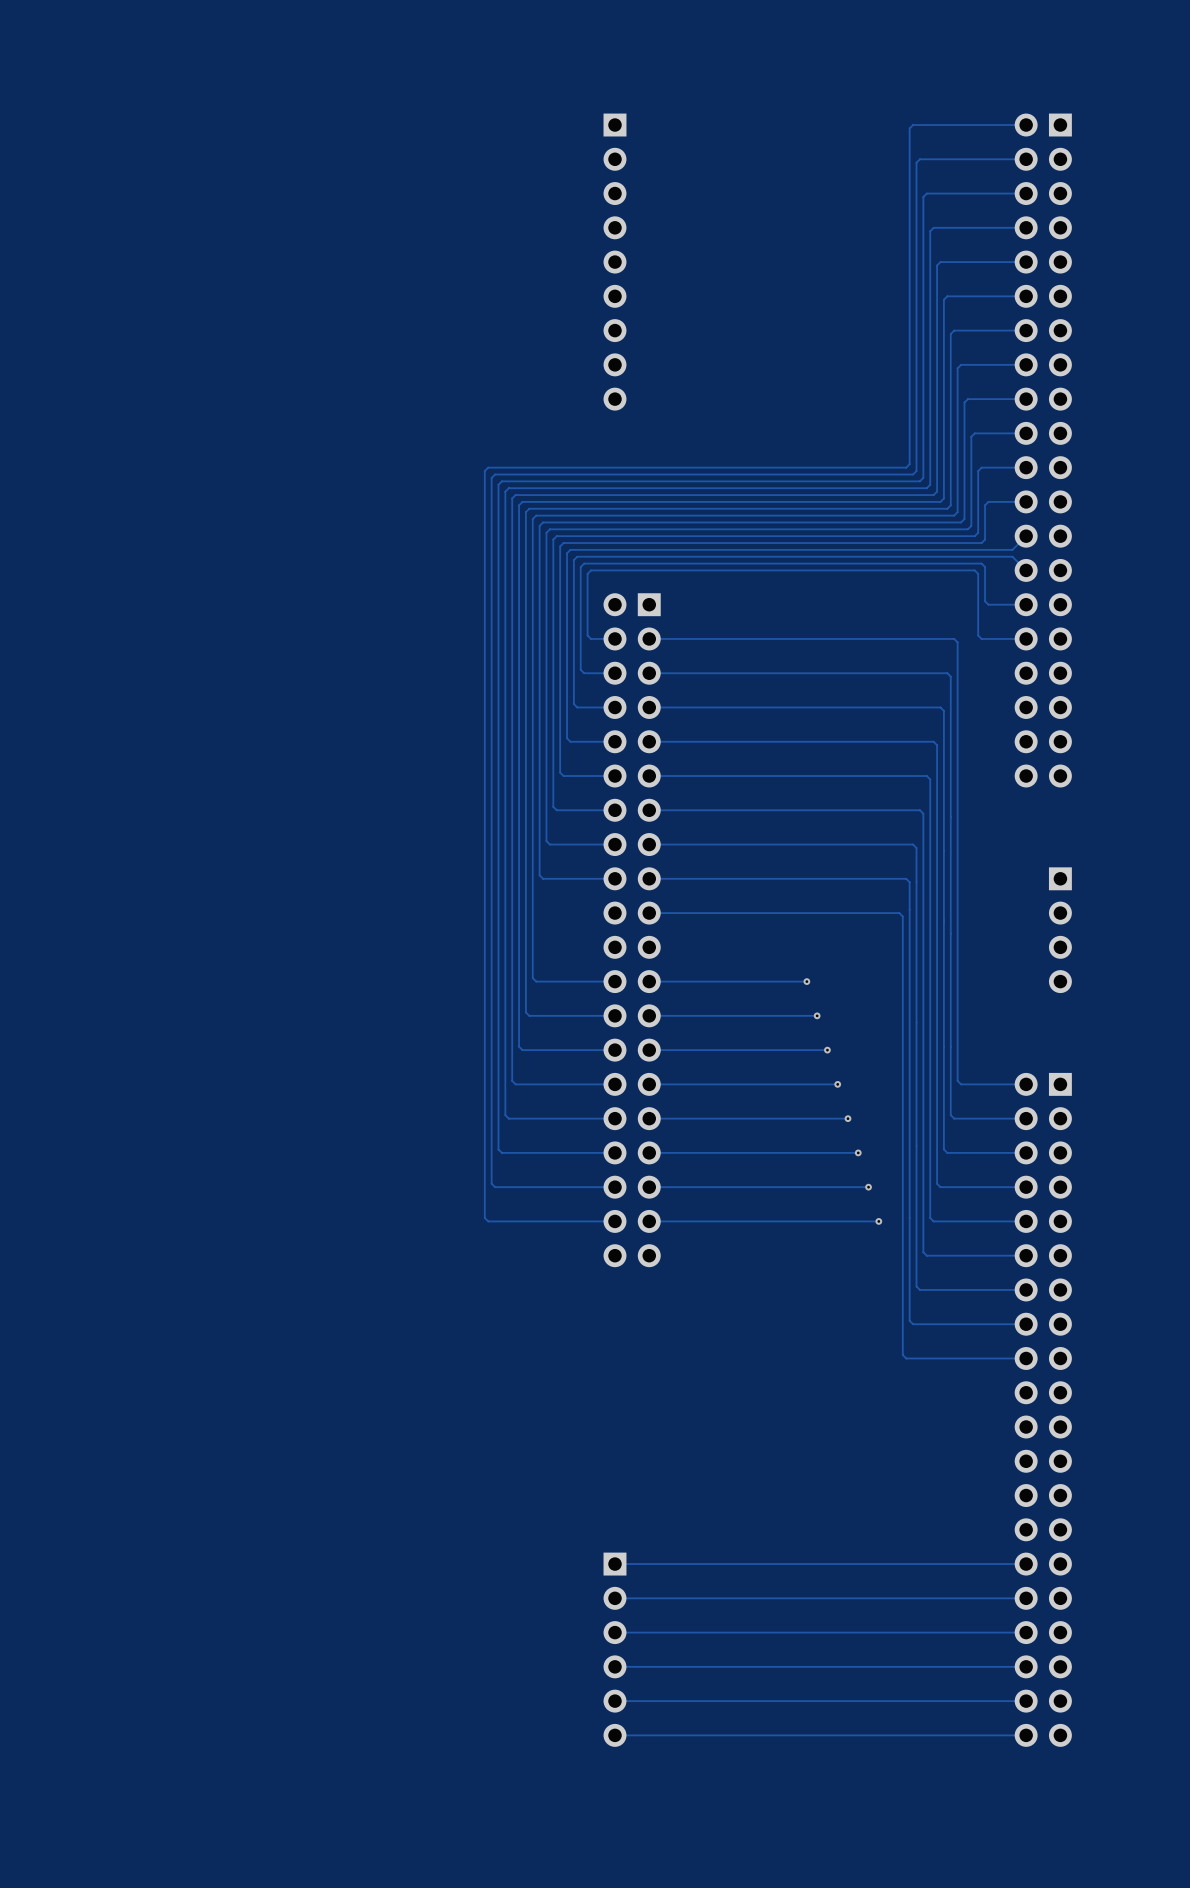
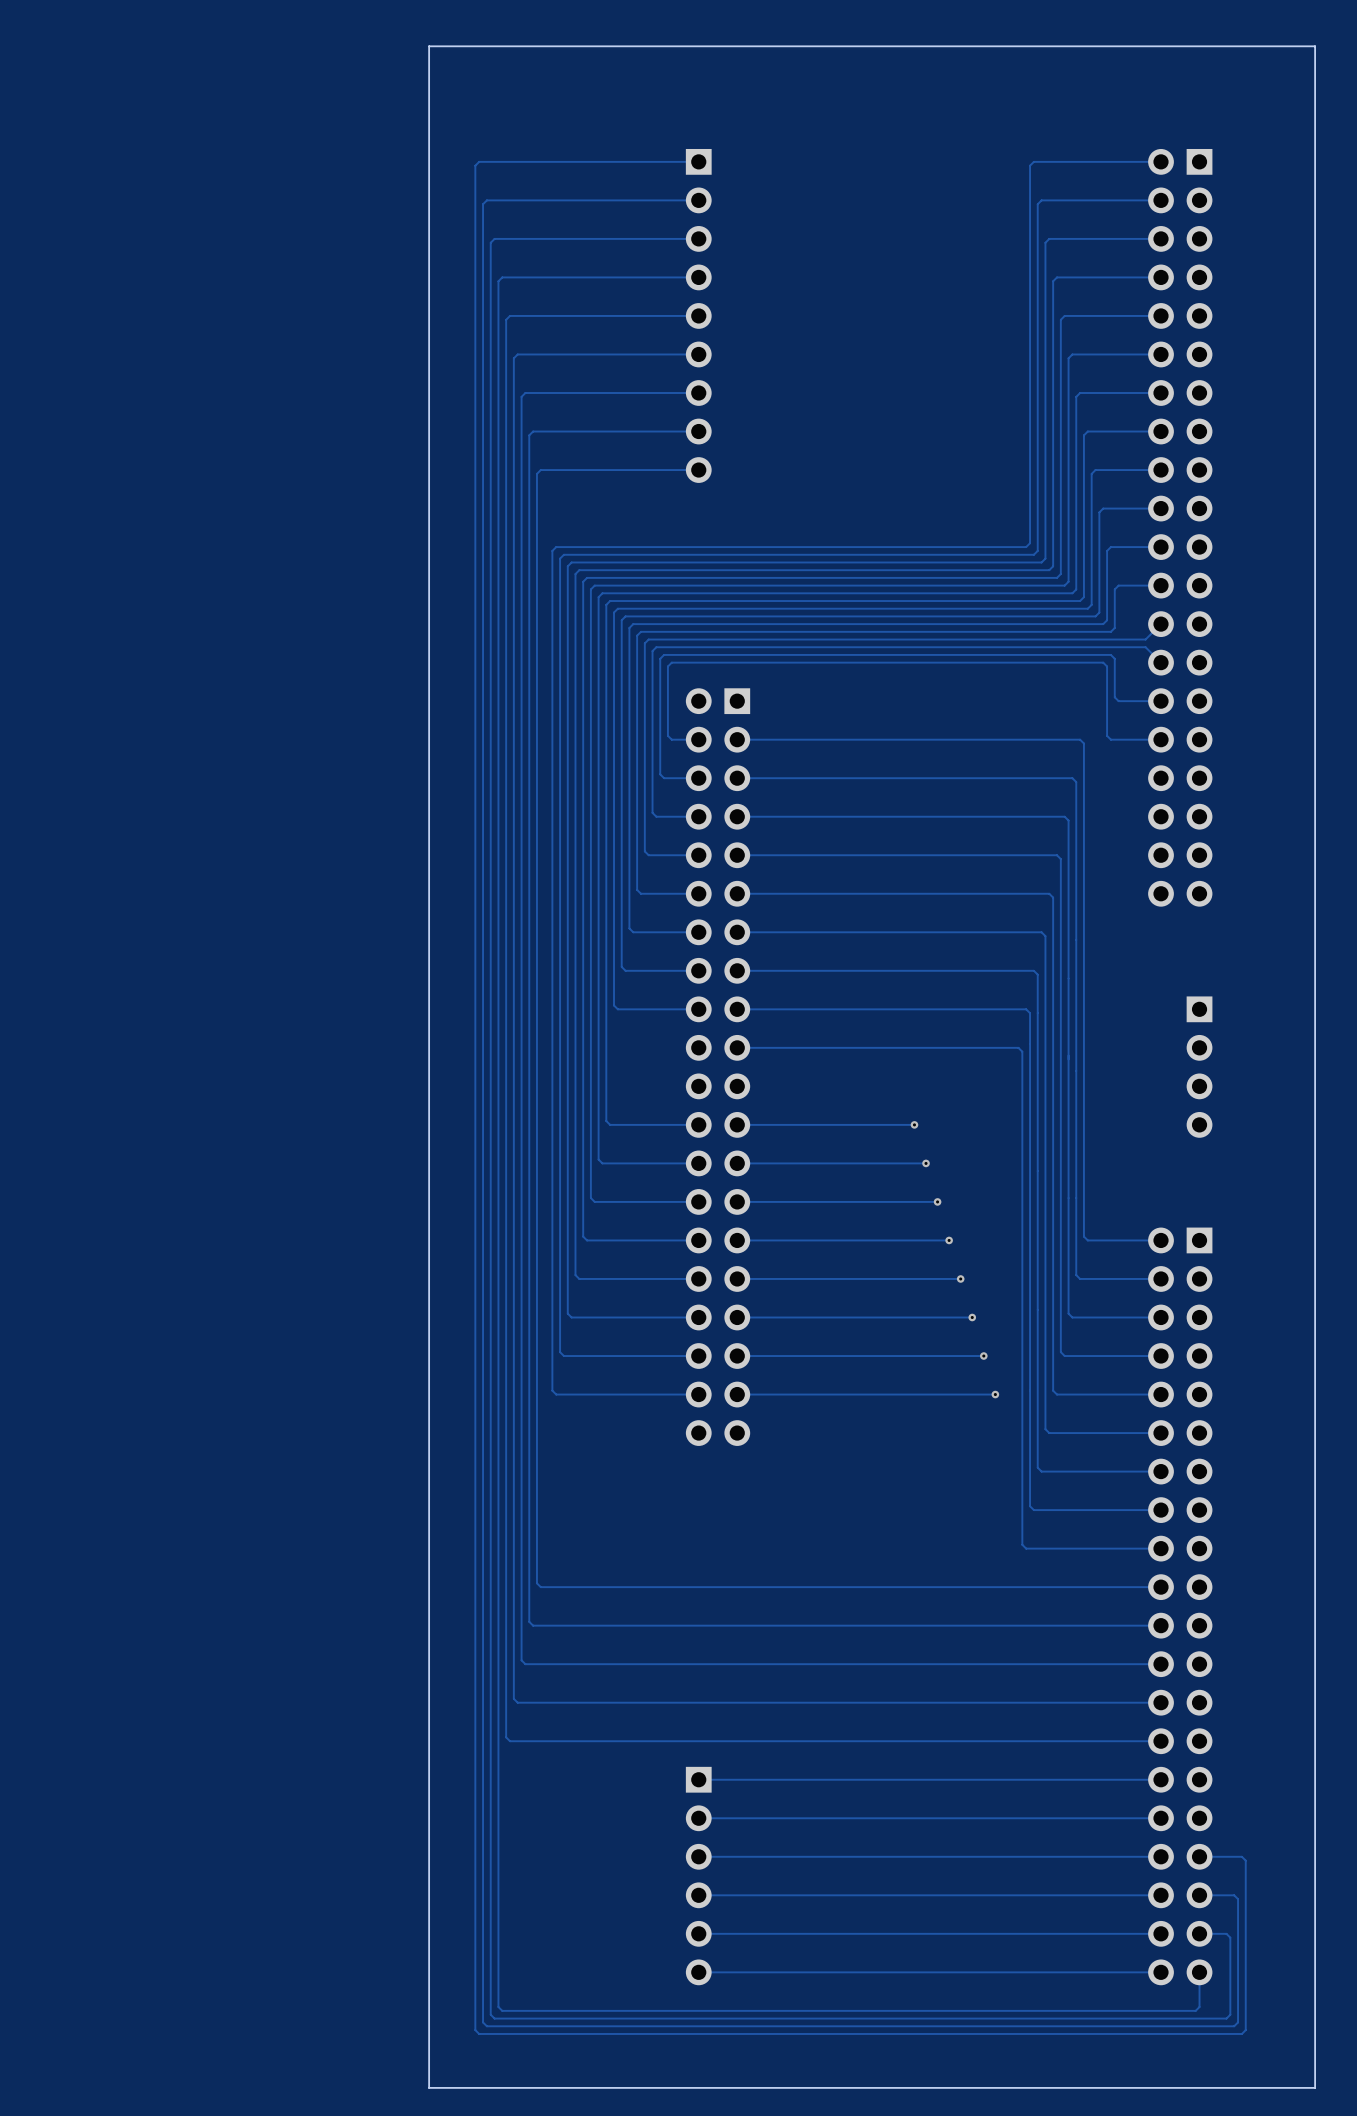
board edge: none -> (1315, 46) (429, 46) (429, 2087) (1315, 2087) (1315, 46)
track: none -> (698, 161) (479, 161) (475, 165) (475, 2030) (479, 2033) (1241, 2033) (1245, 2030) (1245, 1860) (1241, 1856) (1199, 1856)
track: none -> (698, 200) (486, 200) (483, 204) (483, 2022) (486, 2026) (1234, 2026) (1238, 2022) (1238, 1899) (1234, 1895) (1199, 1895)
track: none -> (698, 238) (494, 238) (490, 242) (490, 2014) (494, 2018) (1226, 2018) (1230, 2014) (1230, 1937) (1226, 1933) (1199, 1933)
track: none -> (698, 277) (502, 277) (498, 281) (498, 2007) (502, 2010) (1195, 2010) (1199, 2007) (1199, 1972)
track: none -> (698, 315) (510, 315) (506, 319) (506, 1737) (510, 1741) (1161, 1741)
track: none -> (698, 354) (517, 354) (513, 358) (513, 1698) (517, 1702) (1161, 1702)
track: none -> (698, 392) (525, 392) (521, 396) (521, 1660) (525, 1664) (1161, 1664)
track: none -> (698, 431) (533, 431) (529, 435) (529, 1621) (533, 1625) (1161, 1625)
track: none -> (698, 470) (540, 470) (536, 473) (536, 1583) (540, 1587) (1161, 1587)

